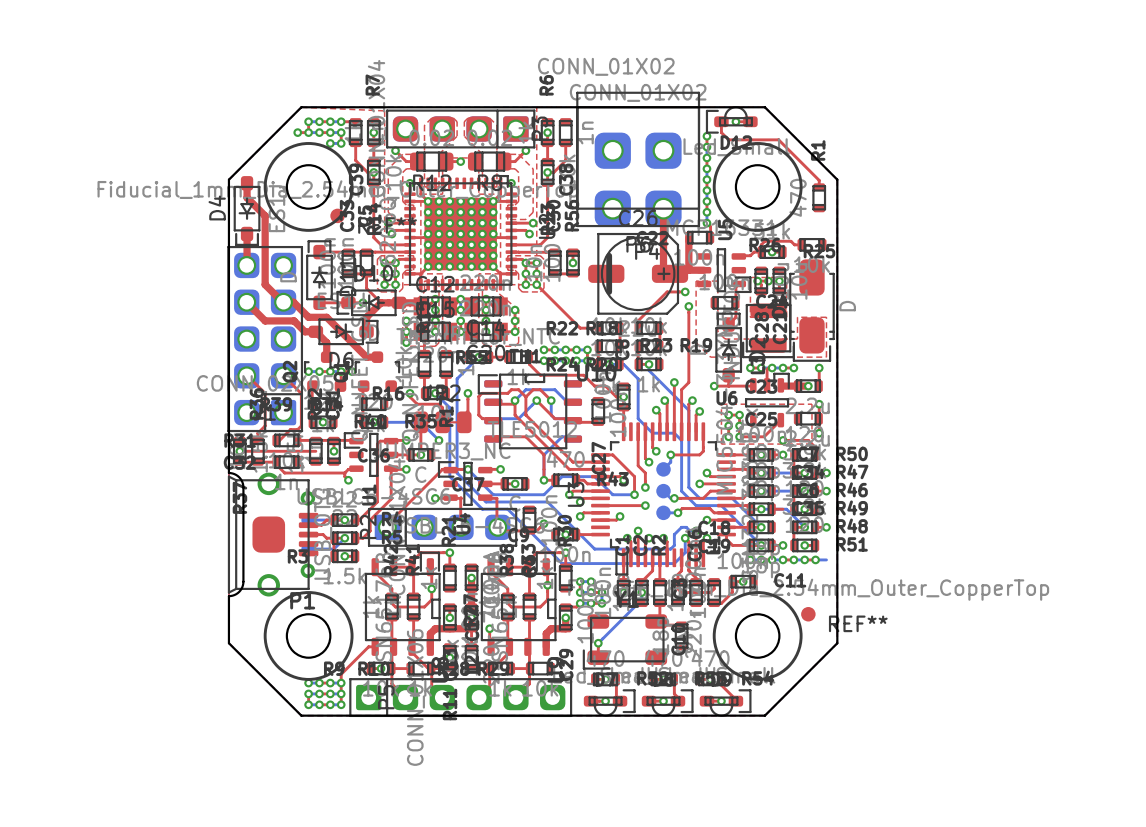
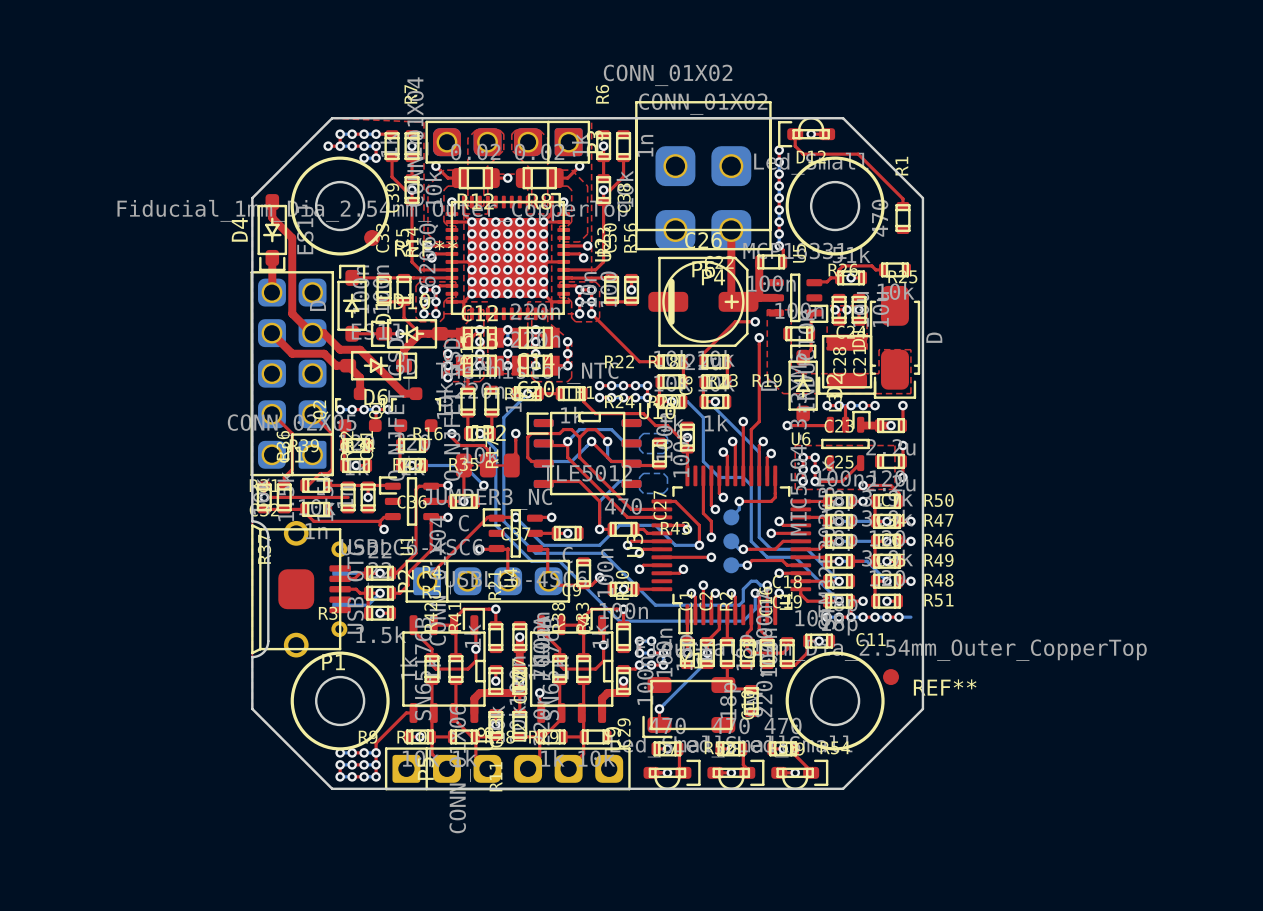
bottom zone outline: none -> (643, 433) (639, 437) (639, 449) (643, 453) (663, 453) (667, 449) (667, 437) (663, 433) (643, 433)
bottom zone outline: none -> (643, 473) (639, 477) (639, 489) (643, 493) (663, 493) (667, 489) (667, 477) (663, 473) (643, 473)

